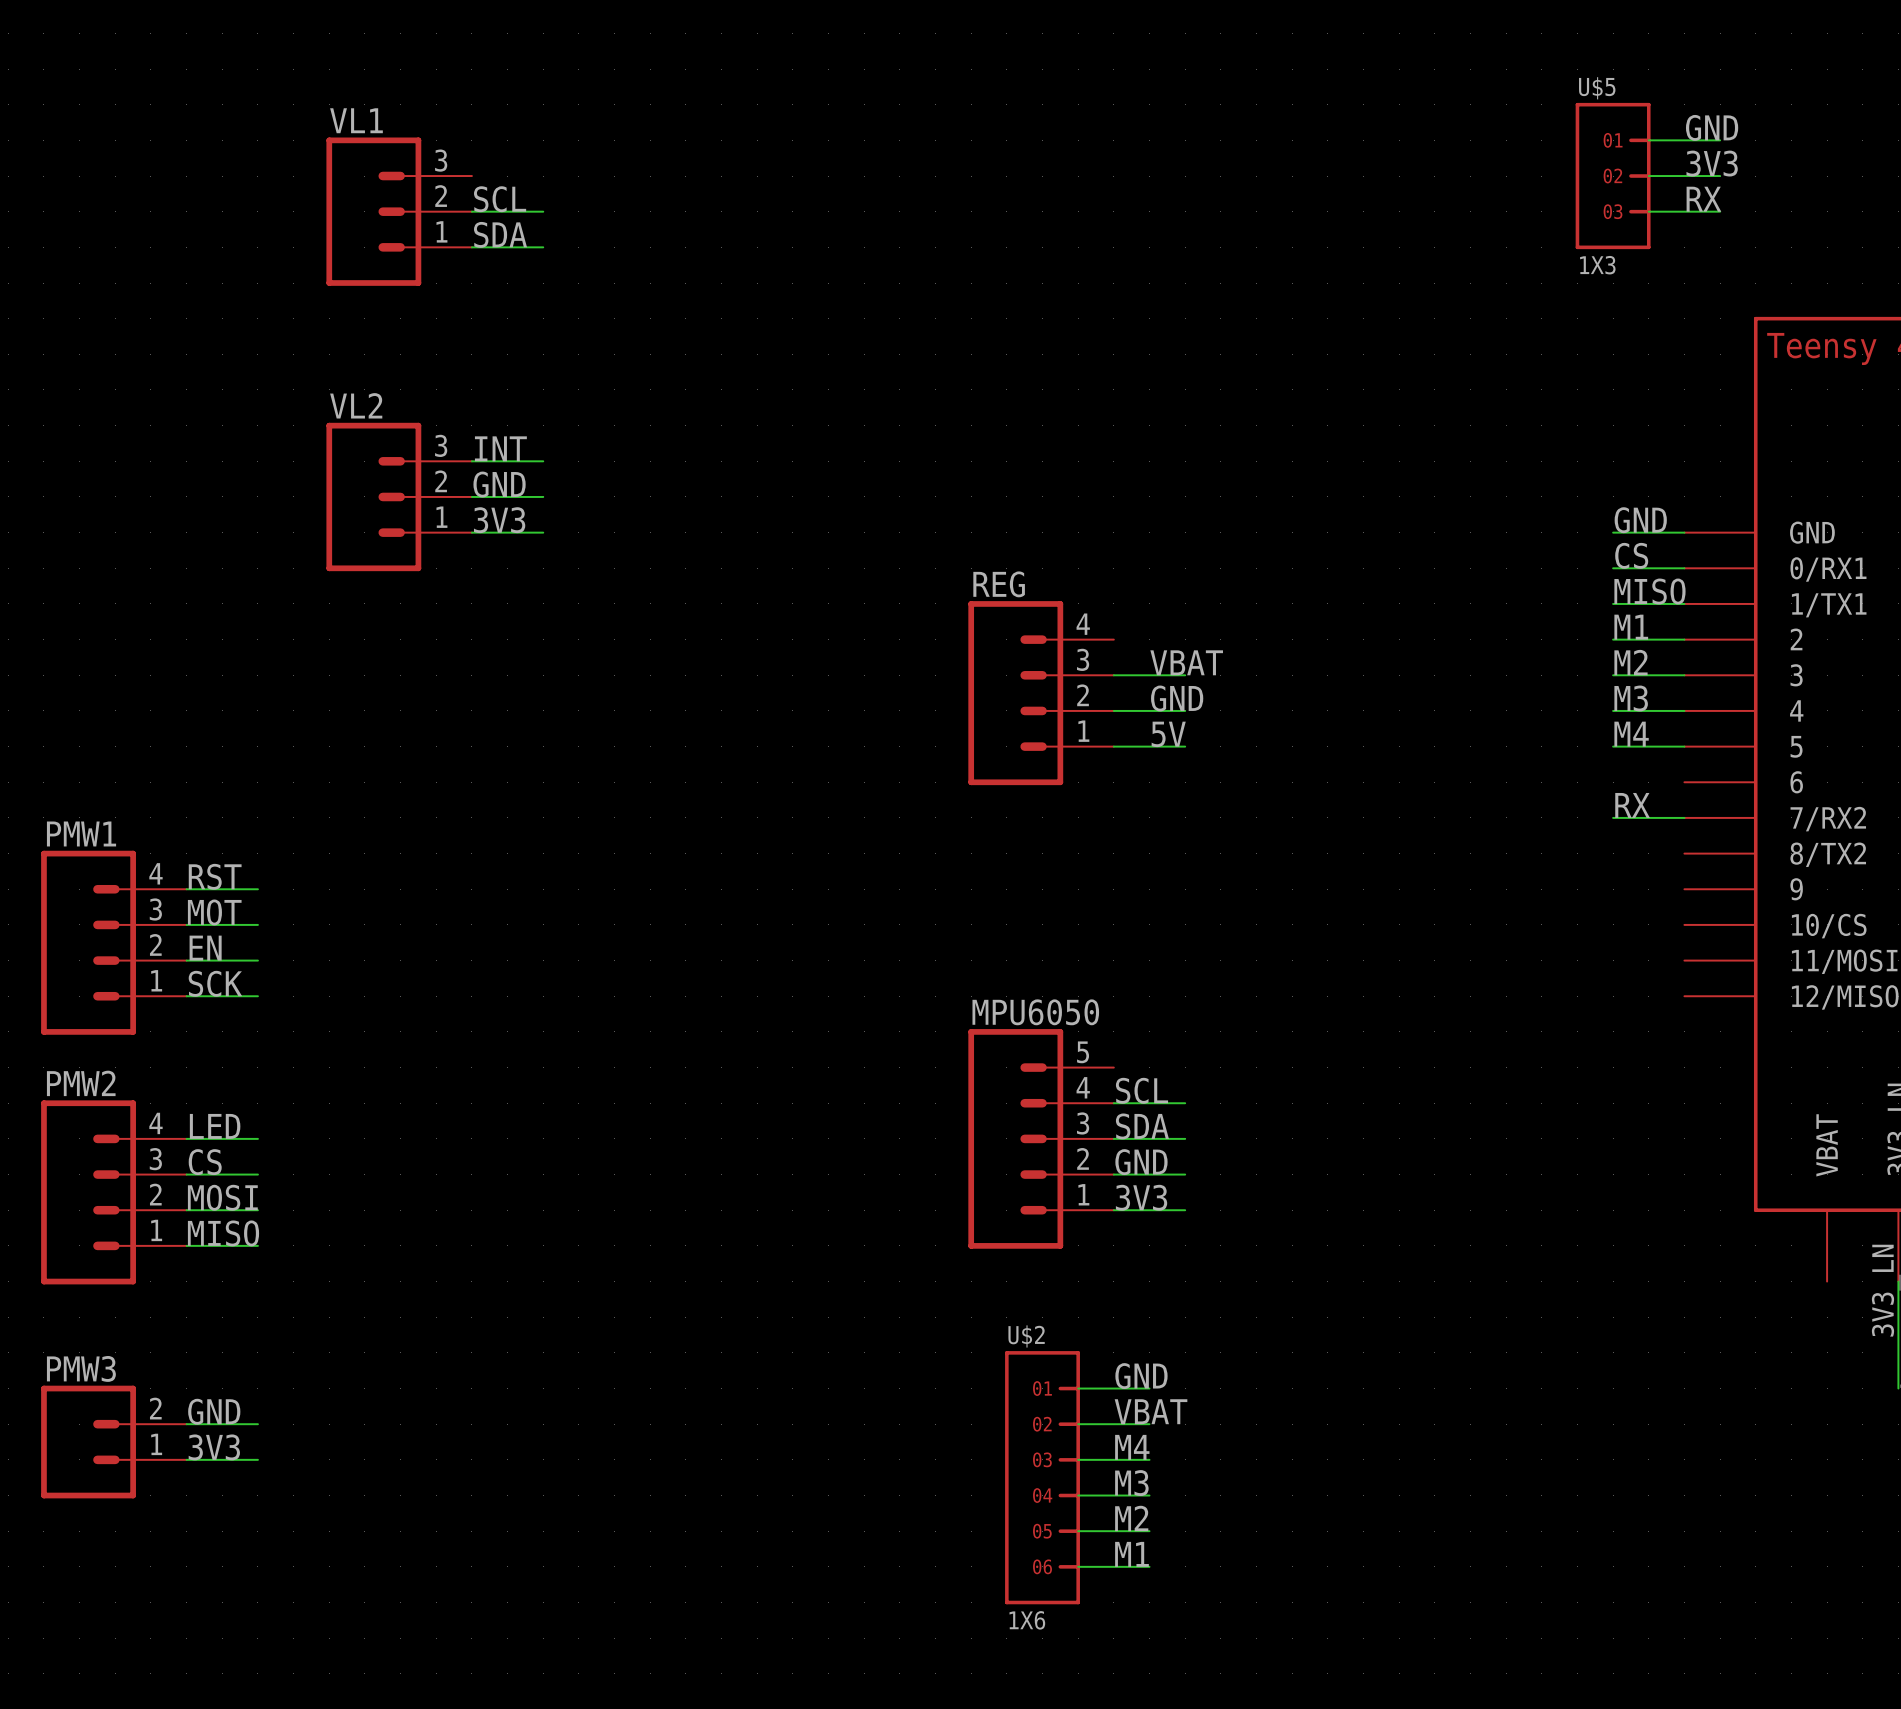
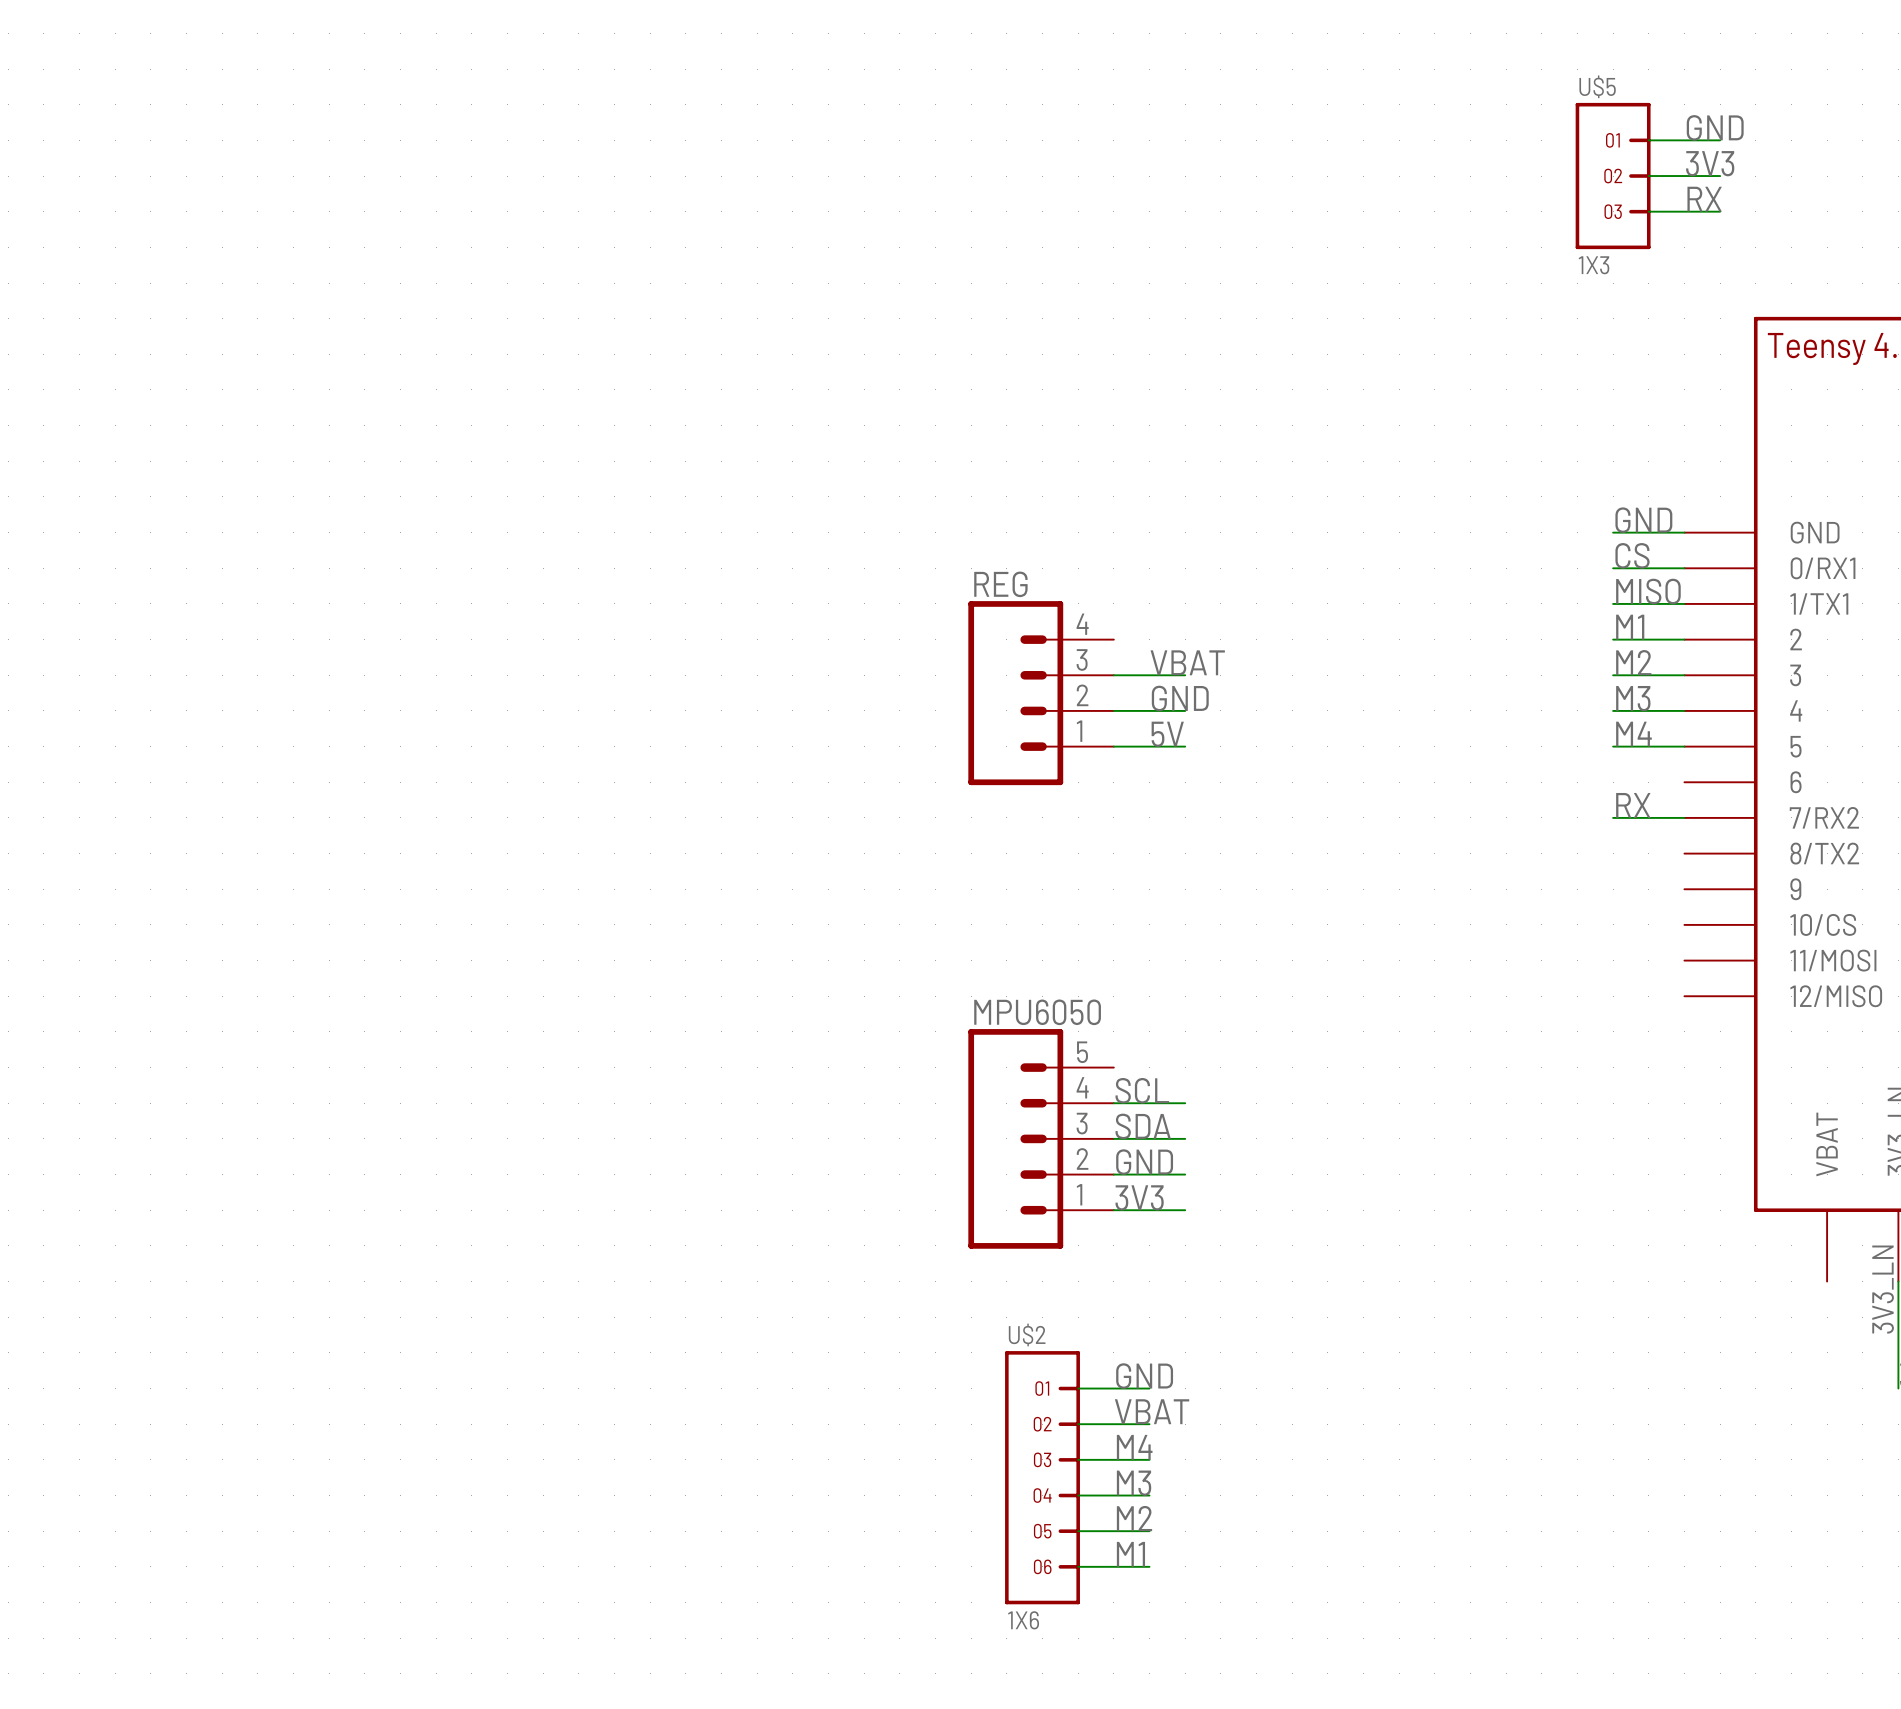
label: SCL (500, 199) -> none
VL1: (399, 211) -> none
wire: (471, 211) (543, 211) -> none
label: SDA (500, 234) -> none
wire: (471, 247) (543, 247) -> none
label: INT (500, 448) -> none
wire: (471, 461) (543, 461) -> none
label: GND (499, 484) -> none
VL2: (399, 496) -> none
wire: (471, 496) (543, 496) -> none
label: 3V3 (499, 520) -> none
wire: (471, 532) (543, 532) -> none
label: RST (215, 876) -> none
wire: (186, 889) (257, 889) -> none
label: MOT (214, 912) -> none
wire: (186, 924) (257, 924) -> none
PMW1: (113, 942) -> none
label: EN (205, 948) -> none
wire: (186, 960) (257, 960) -> none
label: SCK (215, 983) -> none
wire: (186, 996) (257, 996) -> none
label: LED (215, 1126) -> none
wire: (186, 1138) (257, 1138) -> none
label: CS (205, 1162) -> none
wire: (186, 1174) (257, 1174) -> none
PMW2: (113, 1192) -> none
label: MOSI (222, 1197) -> none
wire: (186, 1210) (257, 1210) -> none
label: MISO (223, 1233) -> none
wire: (186, 1245) (257, 1245) -> none
label: GND (214, 1411) -> none
wire: (186, 1424) (257, 1424) -> none
PMW3: (113, 1442) -> none
label: 3V3 (214, 1447) -> none
wire: (186, 1459) (257, 1459) -> none

